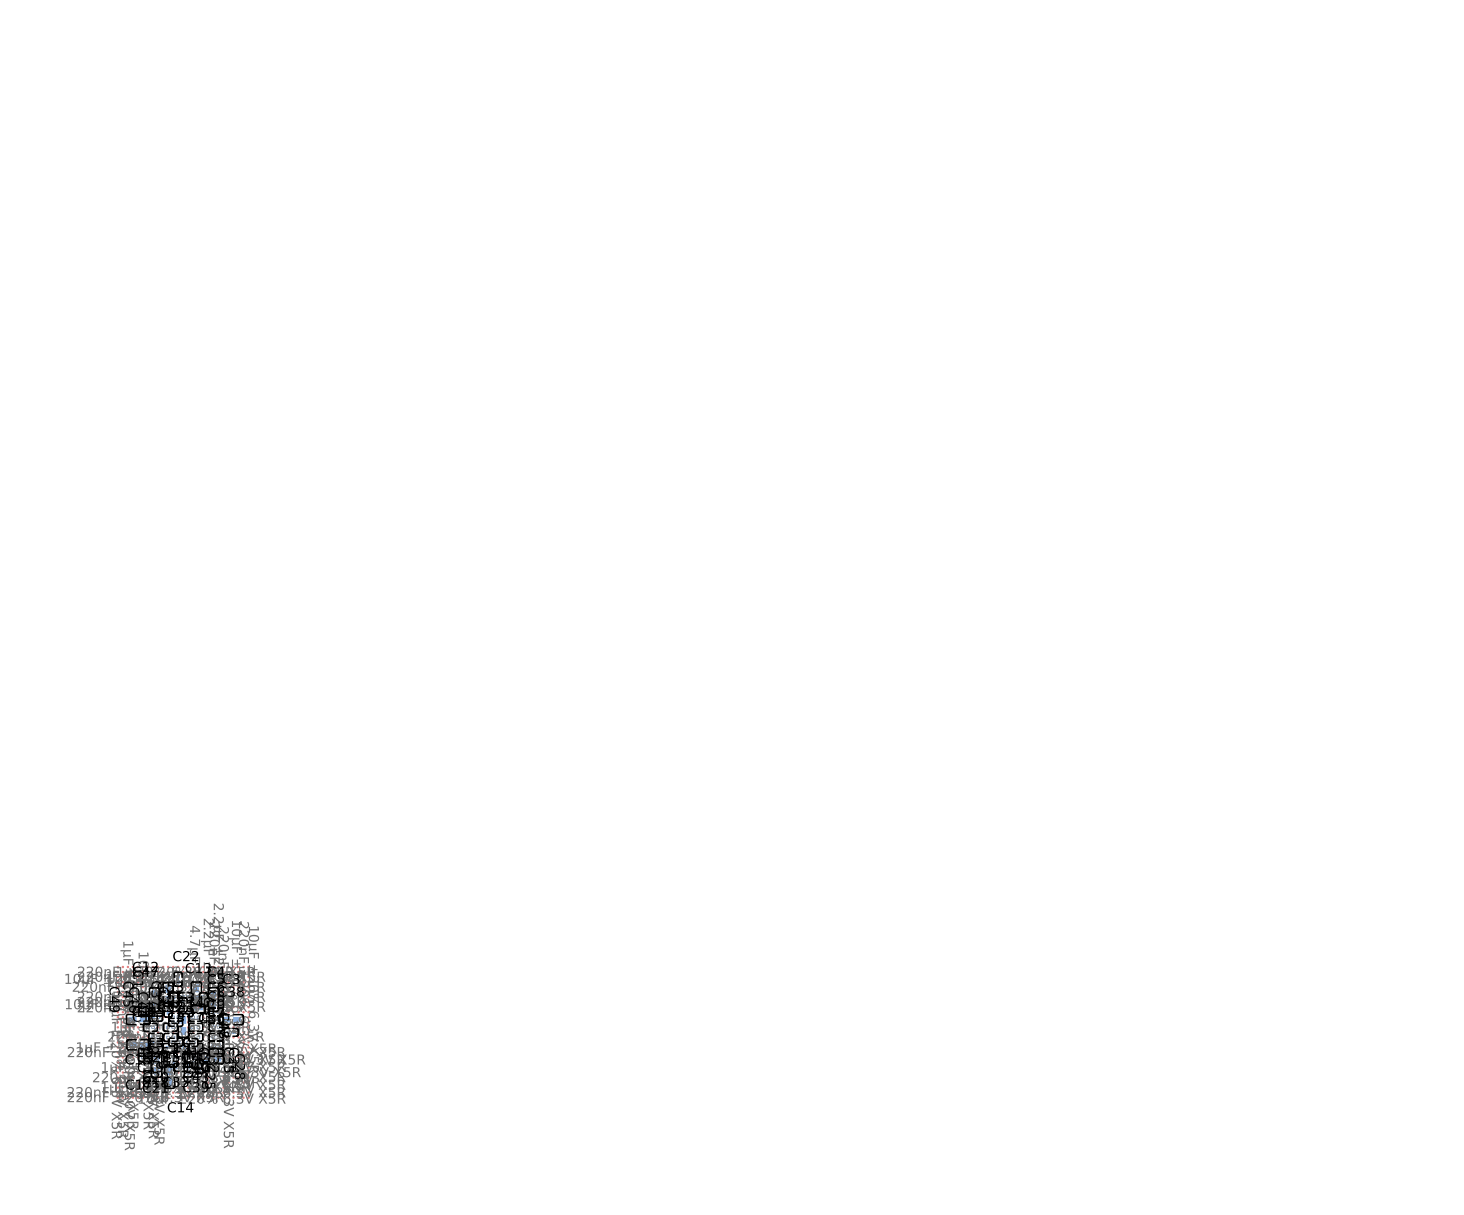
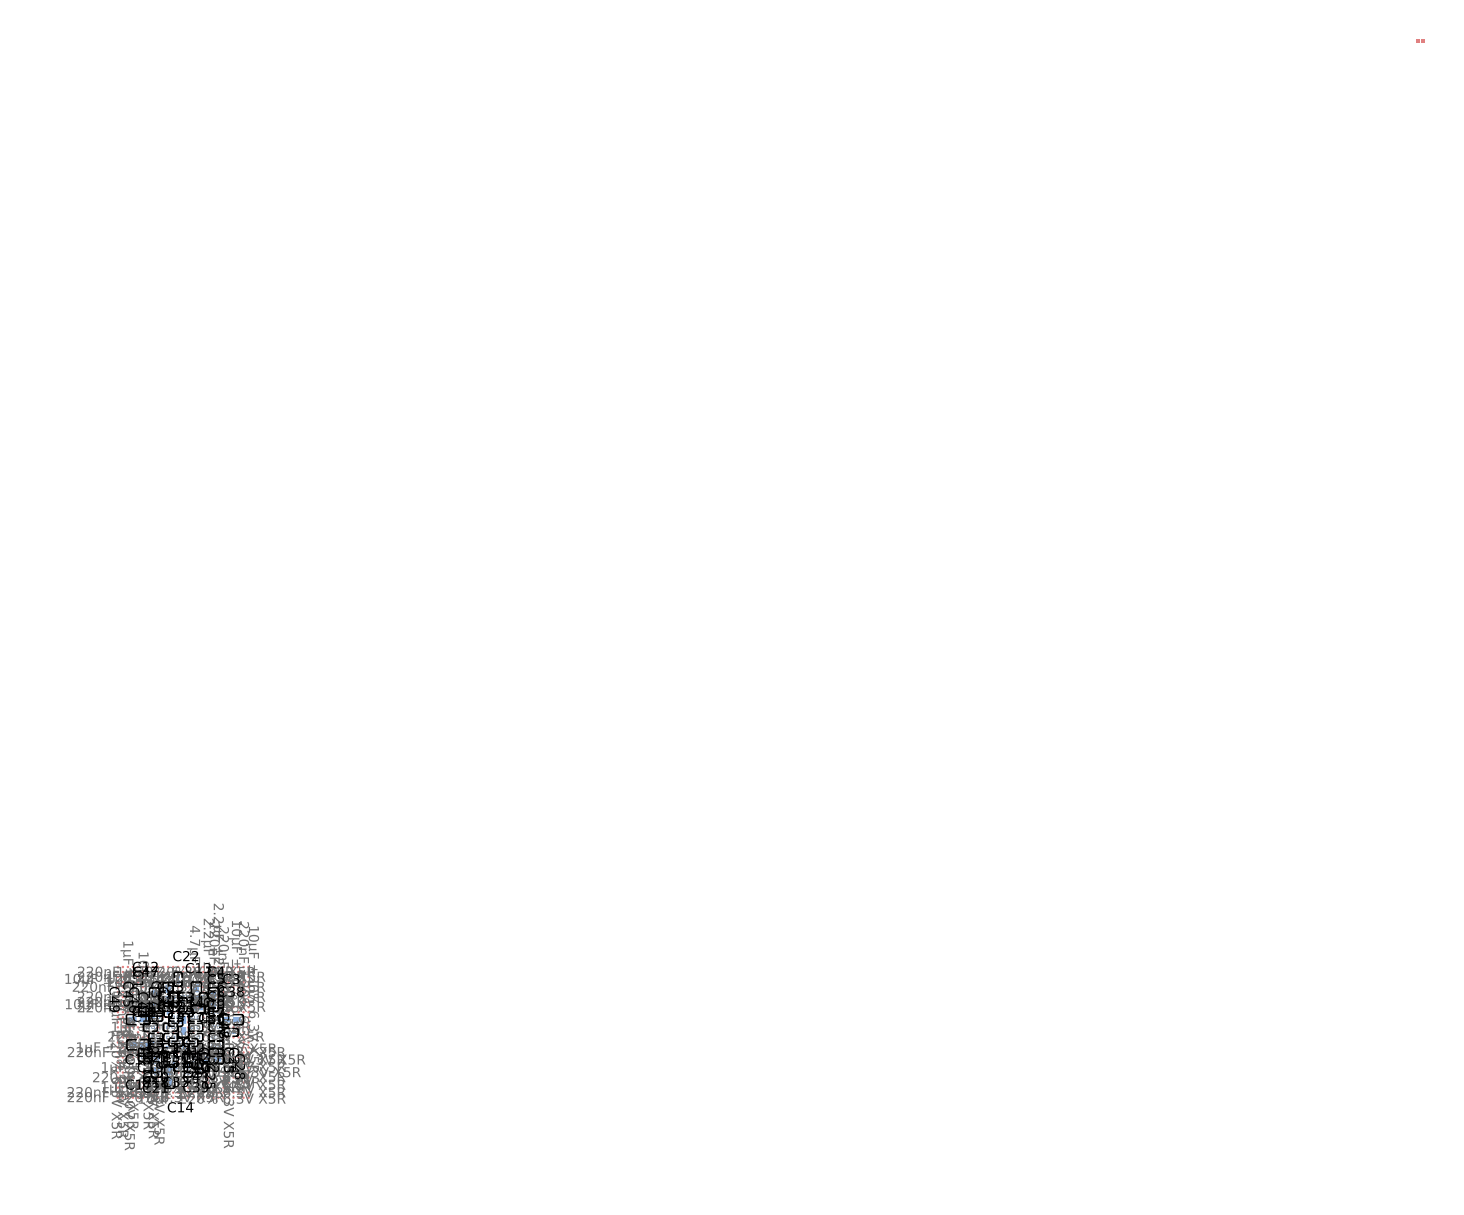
part: none -> (1420, 41)

